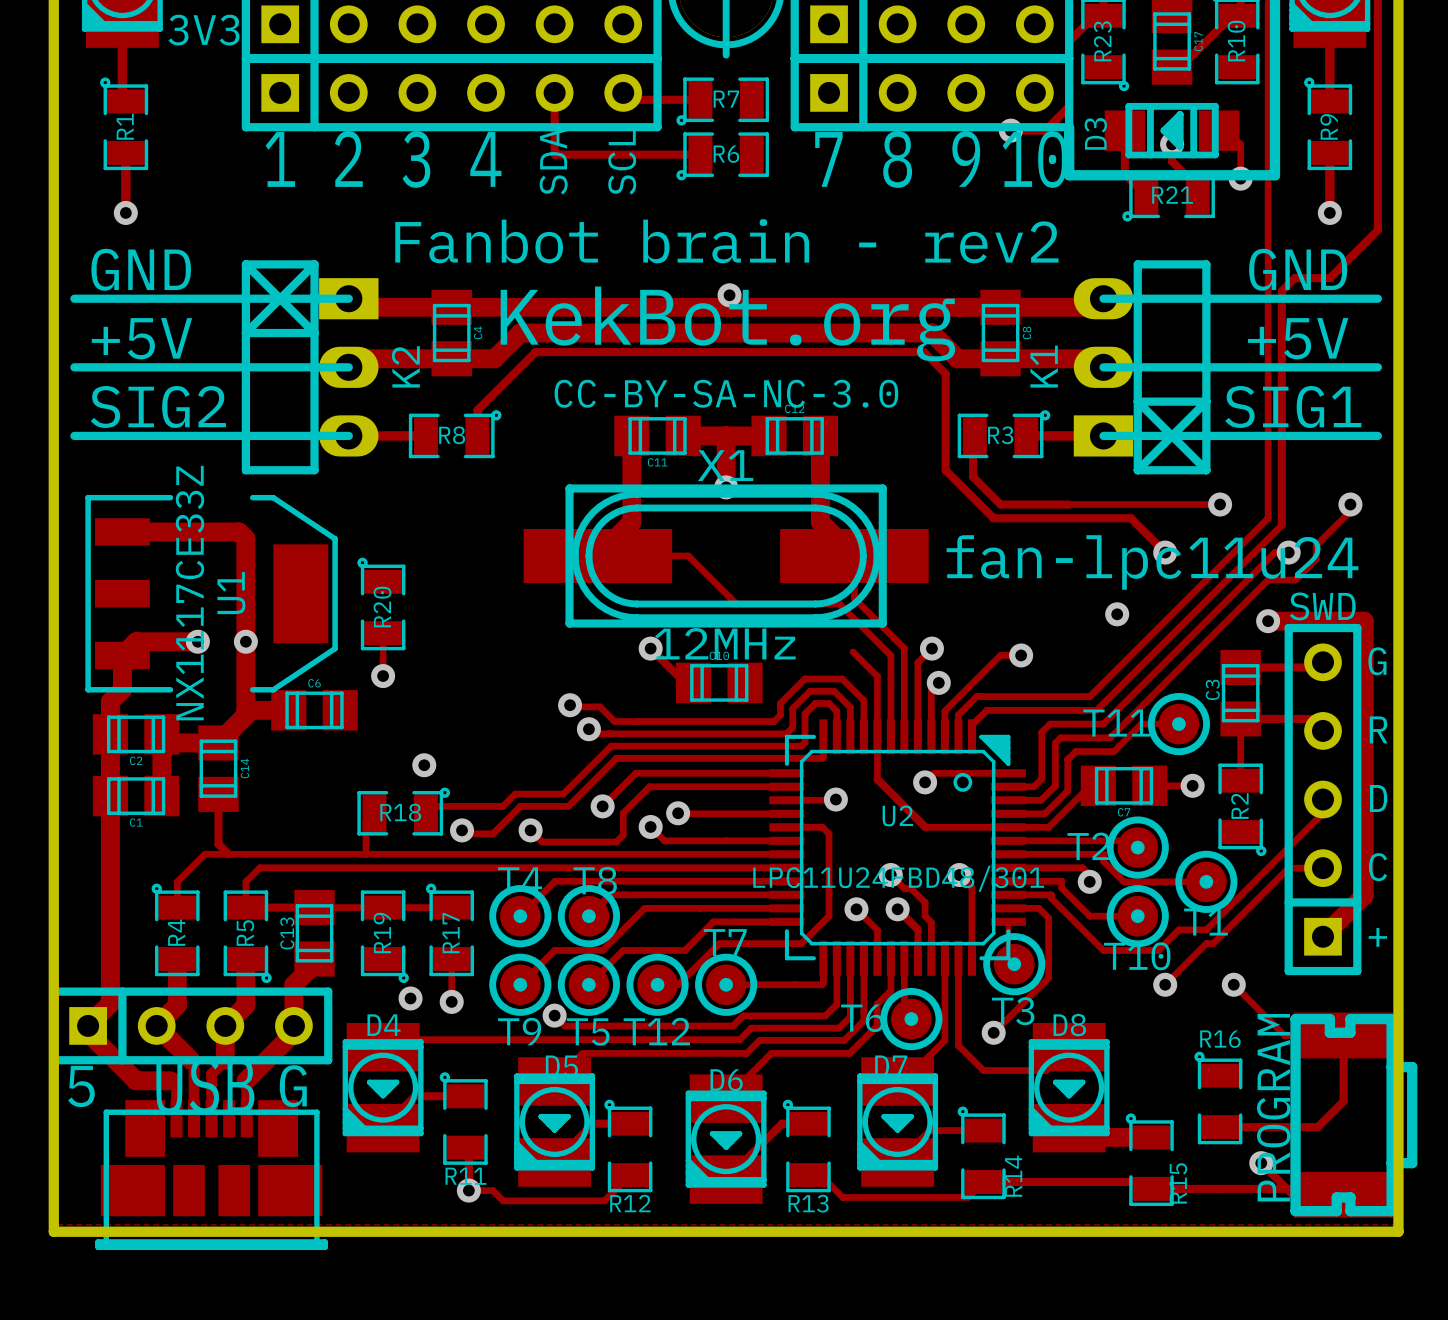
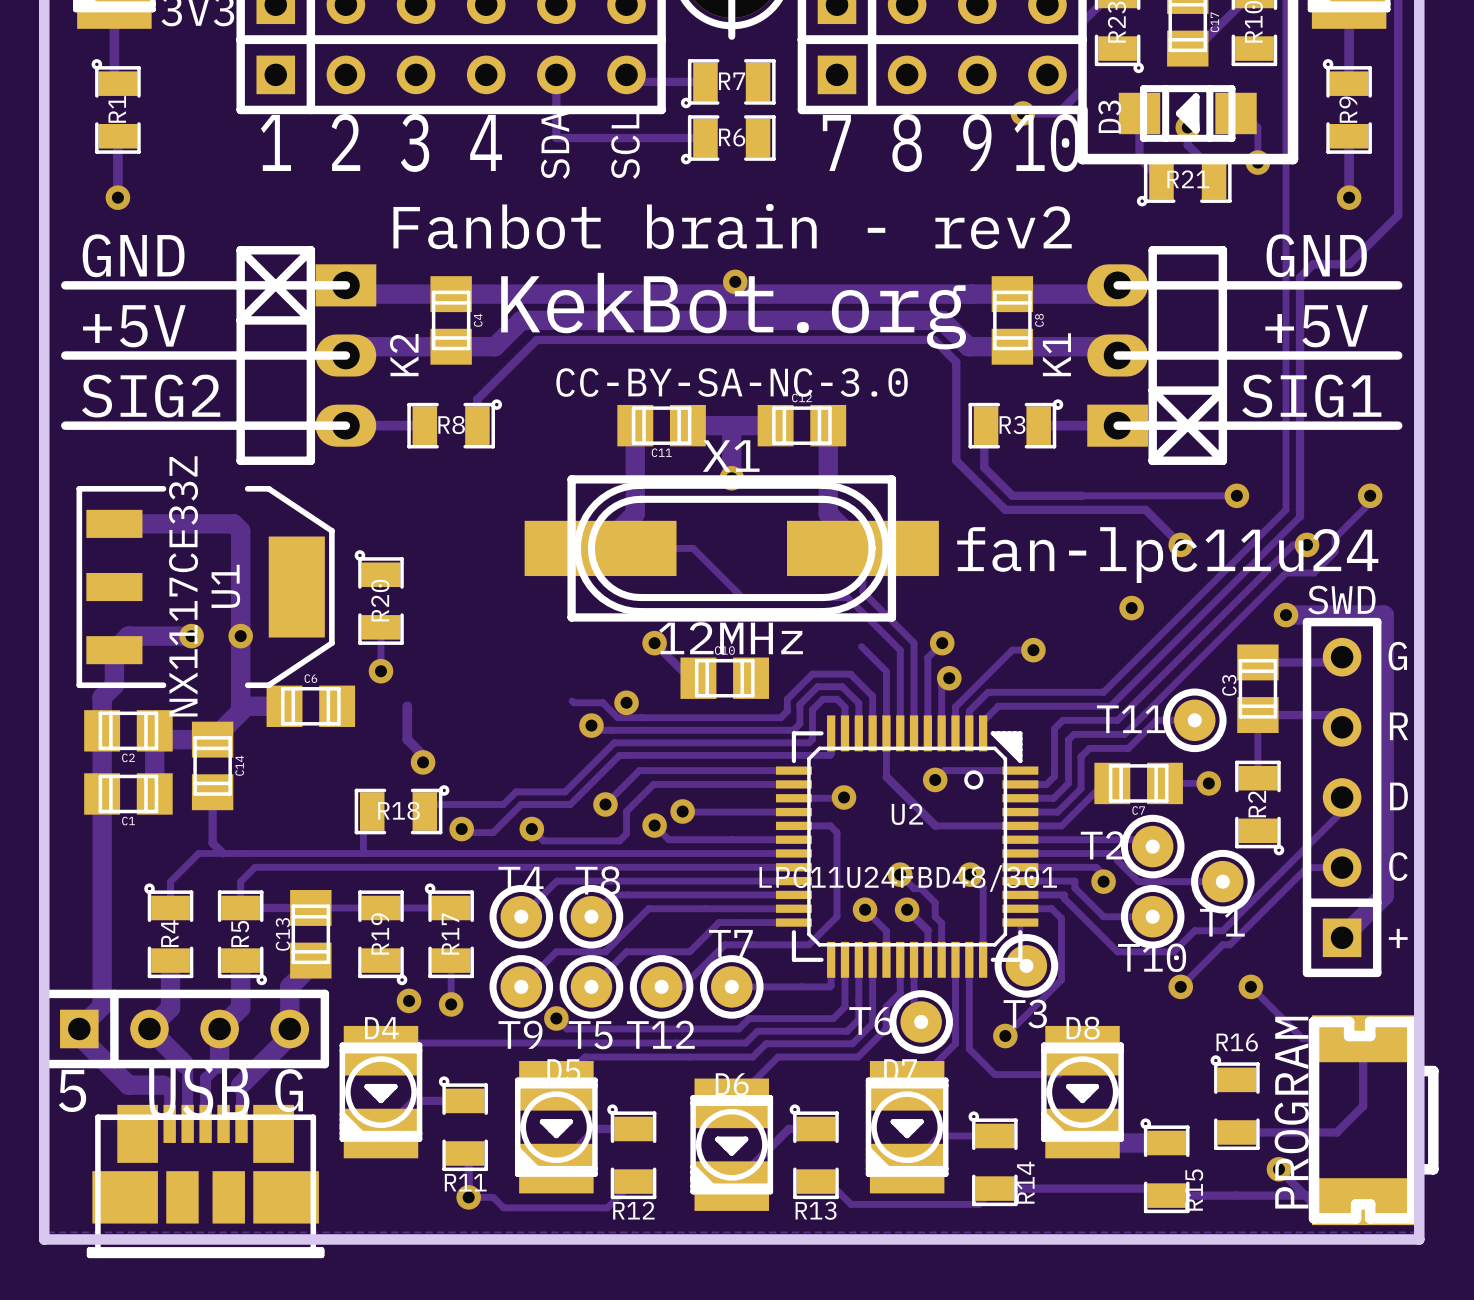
via position: (570, 705) -> (626, 702)
track: none -> (407, 706) (407, 739) (430, 762)

